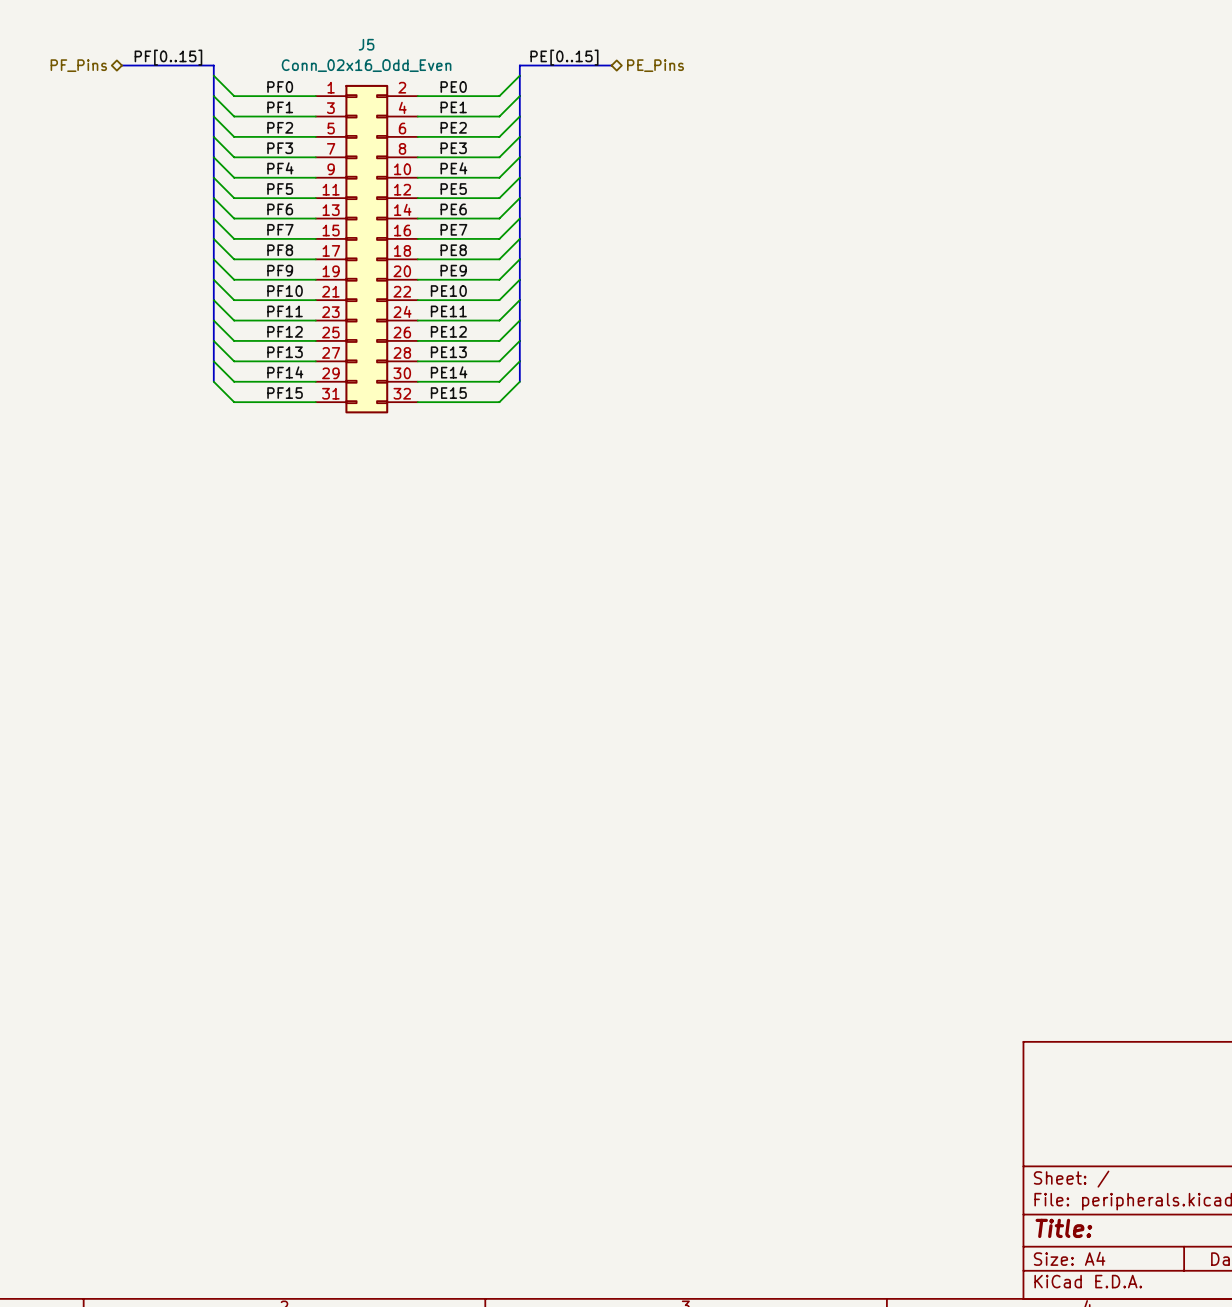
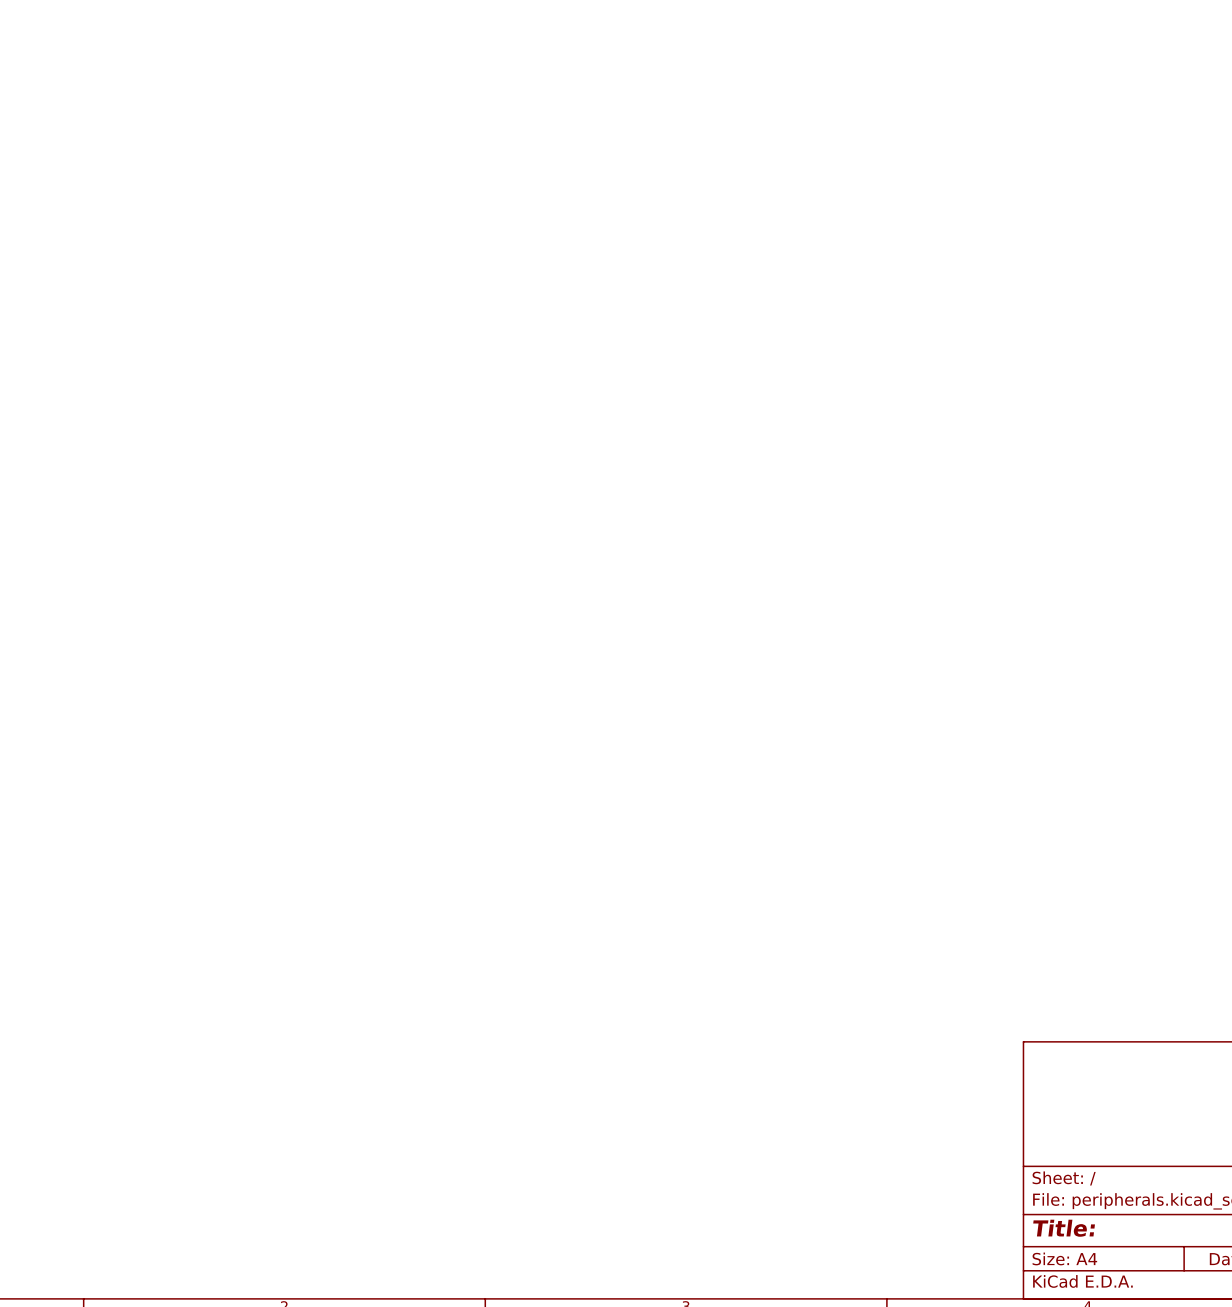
label: PF[0..15] (168, 57) -> none
label: PE[0..15] (564, 57) -> none
hierarchical label: PF_Pins (78, 65) -> none
bus: (121, 65) (213, 65) (213, 381) -> none
bus: (611, 65) (519, 65) (519, 381) -> none
hierarchical label: PE_Pins (655, 65) -> none
wire: (213, 75) (234, 96) (315, 96) -> none
wire: (519, 75) (499, 96) (417, 96) -> none
label: PF0 (280, 87) -> none
label: PE0 (453, 87) -> none
wire: (213, 96) (234, 116) (315, 116) -> none
wire: (519, 96) (499, 116) (417, 116) -> none
label: PF1 (280, 107) -> none
label: PE1 (453, 107) -> none
wire: (213, 116) (234, 136) (315, 136) -> none
wire: (519, 116) (499, 136) (417, 136) -> none
label: PF2 (280, 127) -> none
label: PE2 (453, 127) -> none
wire: (213, 136) (234, 157) (315, 157) -> none
wire: (519, 136) (499, 157) (417, 157) -> none
label: PF3 (280, 148) -> none
label: PE3 (453, 148) -> none
wire: (213, 157) (234, 177) (315, 177) -> none
wire: (519, 157) (499, 177) (417, 177) -> none
label: PF4 (280, 168) -> none
label: PE4 (453, 168) -> none
wire: (213, 177) (234, 198) (315, 198) -> none
wire: (519, 177) (499, 198) (417, 198) -> none
label: PF5 (280, 189) -> none
label: PE5 (453, 189) -> none
wire: (213, 198) (234, 218) (315, 218) -> none
wire: (519, 198) (499, 218) (417, 218) -> none
label: PF6 (280, 209) -> none
label: PE6 (453, 209) -> none
wire: (213, 218) (234, 238) (315, 238) -> none
wire: (519, 218) (499, 238) (417, 238) -> none
label: PF7 (280, 229) -> none
label: PE7 (453, 229) -> none
wire: (213, 238) (234, 259) (315, 259) -> none
wire: (519, 238) (499, 259) (417, 259) -> none
J5: Conn_02x16_Odd_Even (366, 249) -> none
label: PF8 (280, 250) -> none
label: PE8 (453, 250) -> none
wire: (213, 259) (234, 279) (315, 279) -> none
wire: (519, 259) (499, 279) (417, 279) -> none
label: PF9 (280, 270) -> none
label: PE9 (453, 270) -> none
wire: (213, 279) (234, 300) (315, 300) -> none
wire: (519, 279) (499, 300) (417, 300) -> none
label: PF10 (285, 291) -> none
label: PE10 (448, 291) -> none
wire: (213, 300) (234, 320) (315, 320) -> none
wire: (519, 300) (499, 320) (417, 320) -> none
label: PF11 (285, 311) -> none
label: PE11 (448, 311) -> none
wire: (213, 320) (234, 340) (315, 340) -> none
wire: (519, 320) (499, 340) (417, 340) -> none
label: PF12 (285, 331) -> none
label: PE12 (448, 331) -> none
wire: (213, 340) (234, 361) (315, 361) -> none
wire: (519, 340) (499, 361) (417, 361) -> none
label: PF13 (285, 352) -> none
label: PE13 (448, 352) -> none
wire: (213, 361) (234, 381) (315, 381) -> none
wire: (519, 361) (499, 381) (417, 381) -> none
label: PF14 (285, 372) -> none
label: PE14 (449, 372) -> none
wire: (213, 381) (234, 402) (315, 402) -> none
wire: (519, 381) (499, 402) (417, 402) -> none
label: PF15 (285, 393) -> none
label: PE15 (448, 393) -> none

